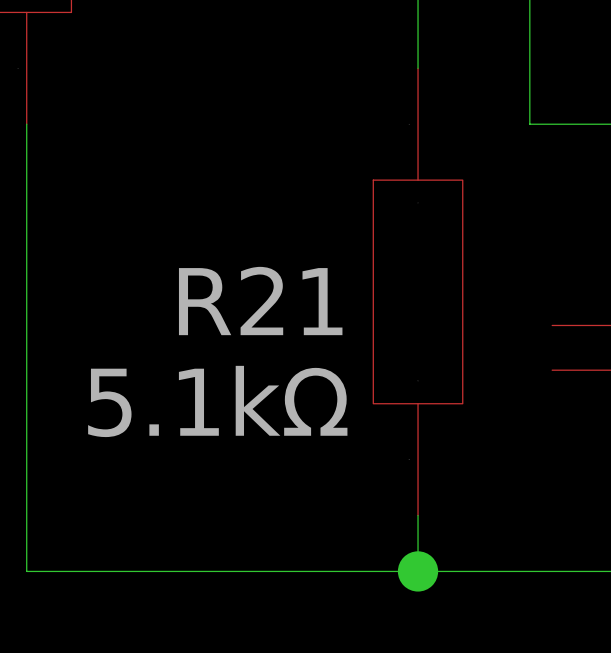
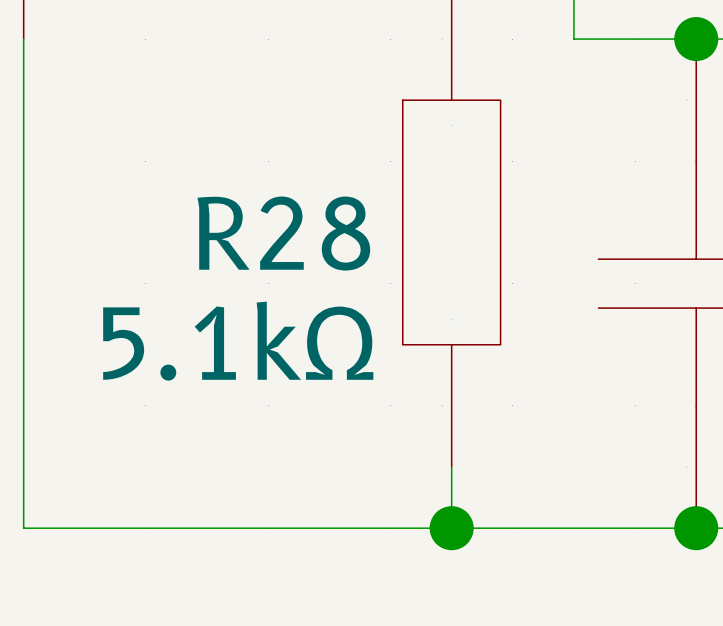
R21 name: R21 (260, 301) -> R28 (283, 233)

